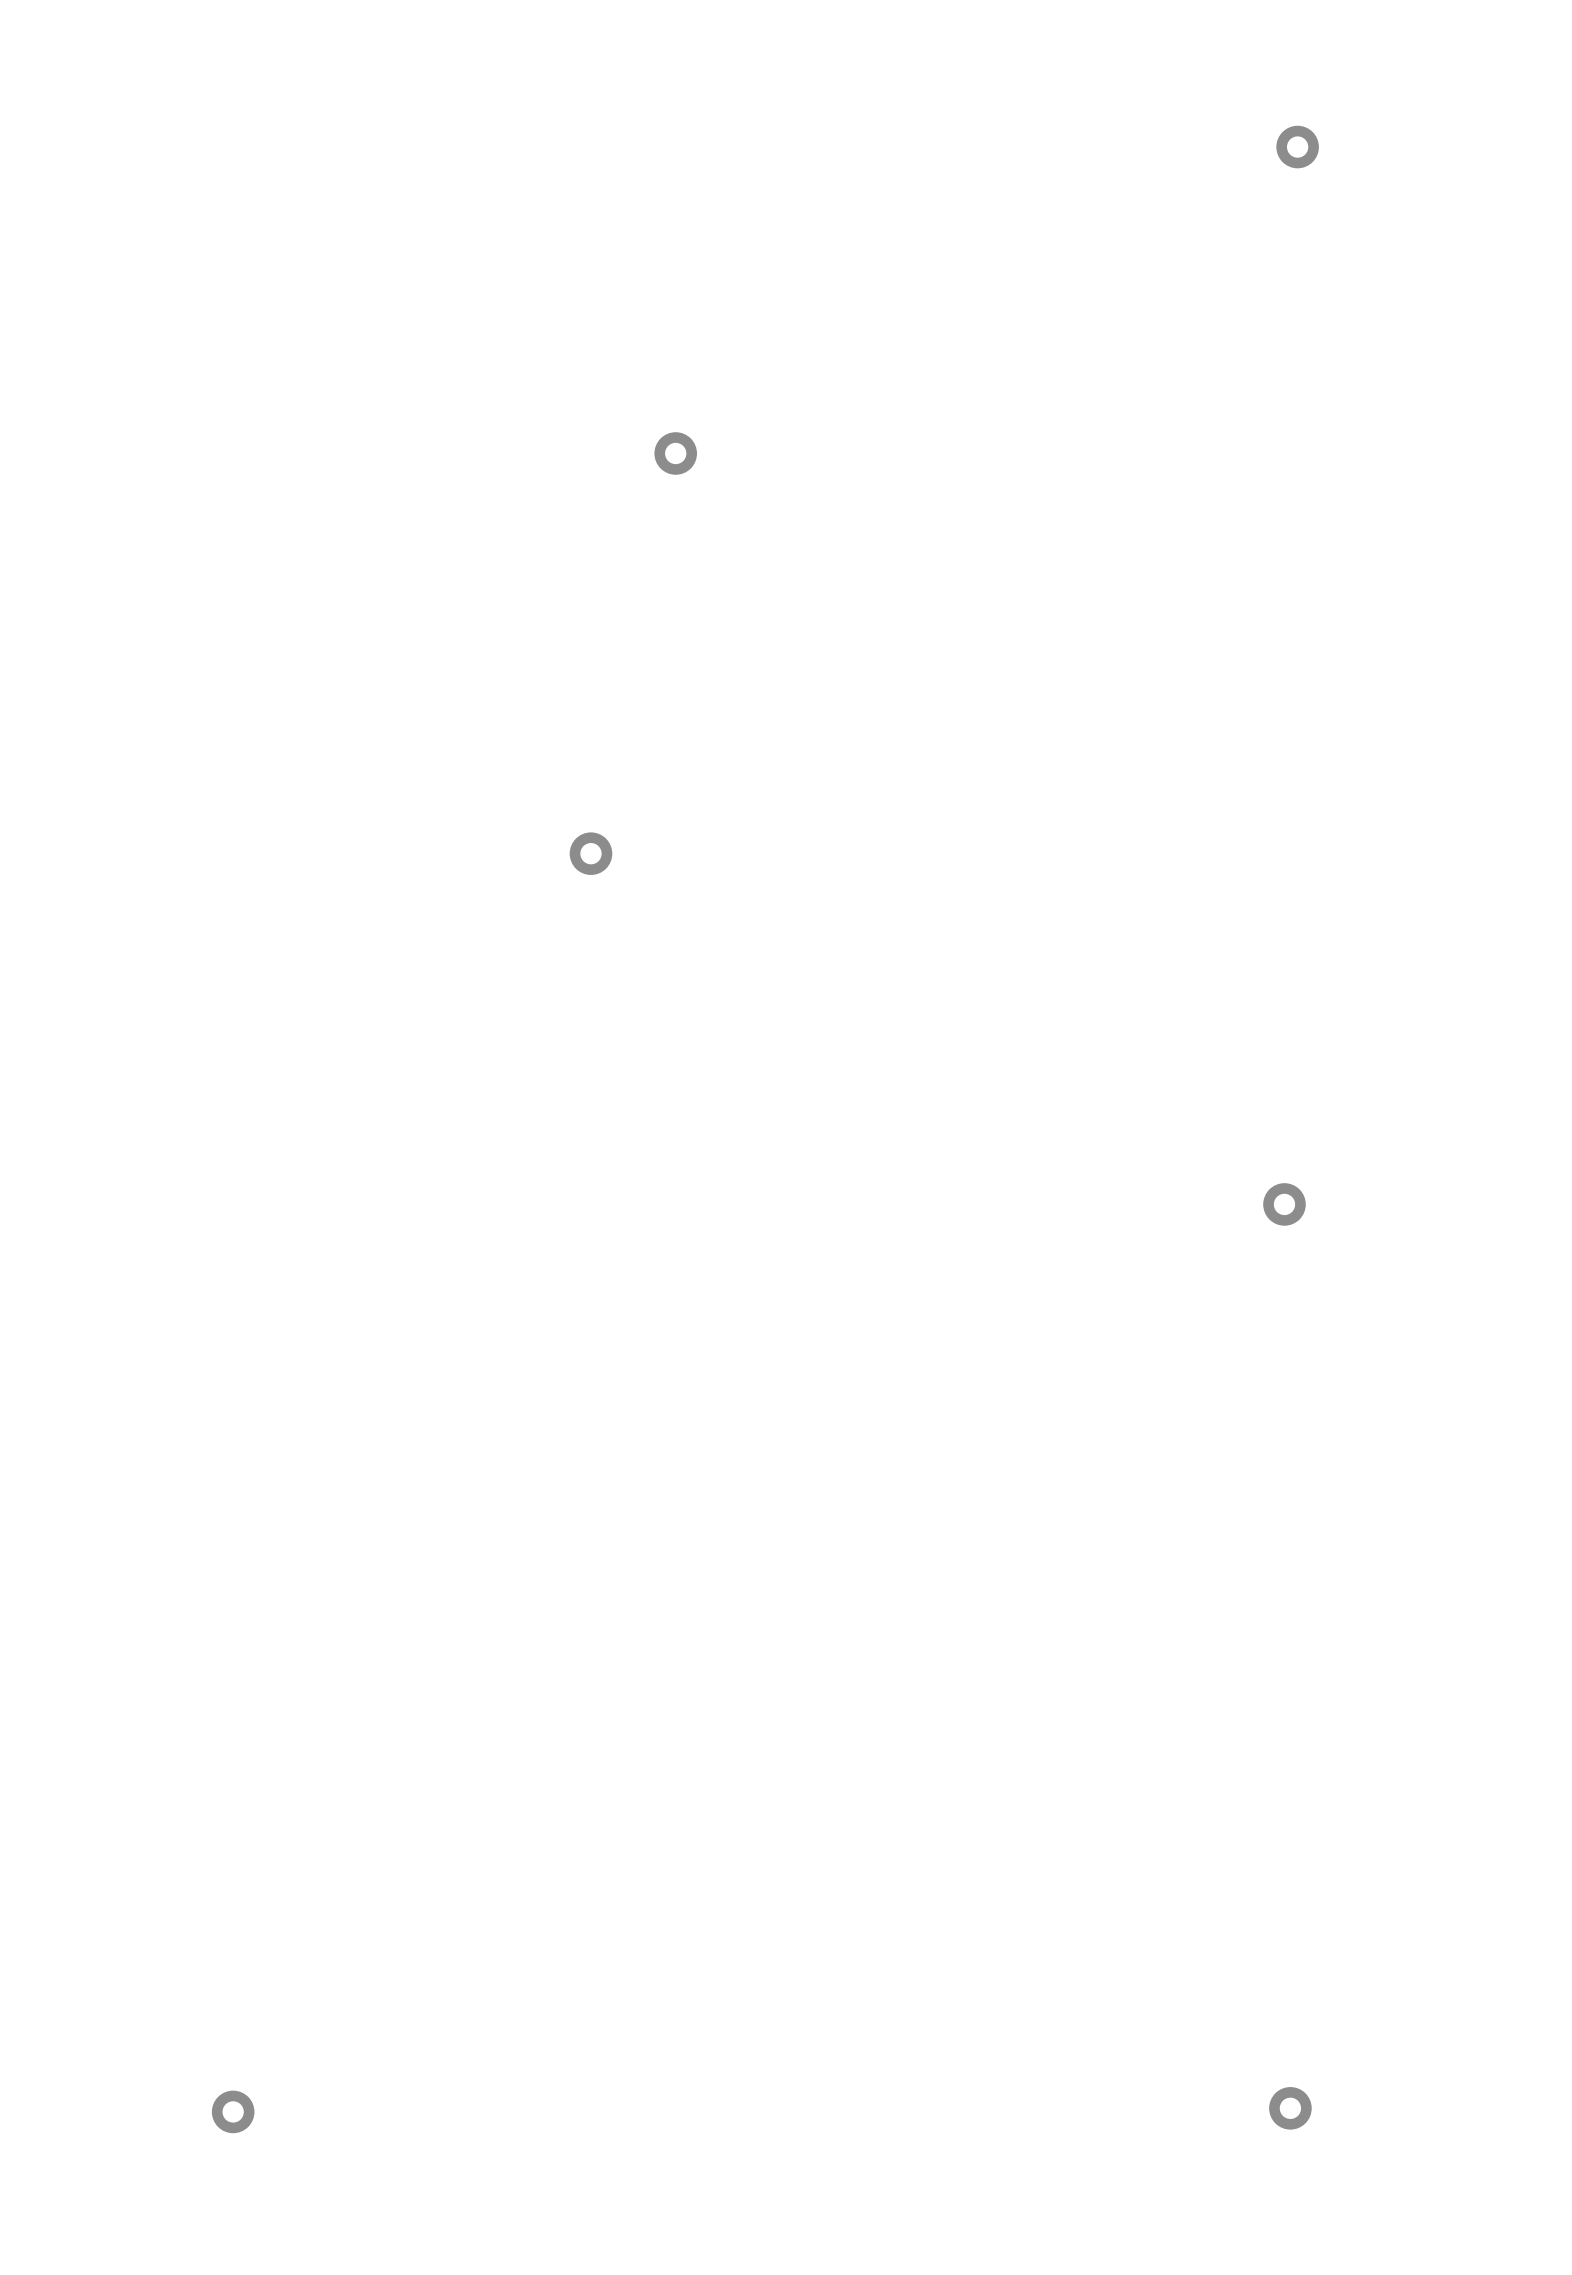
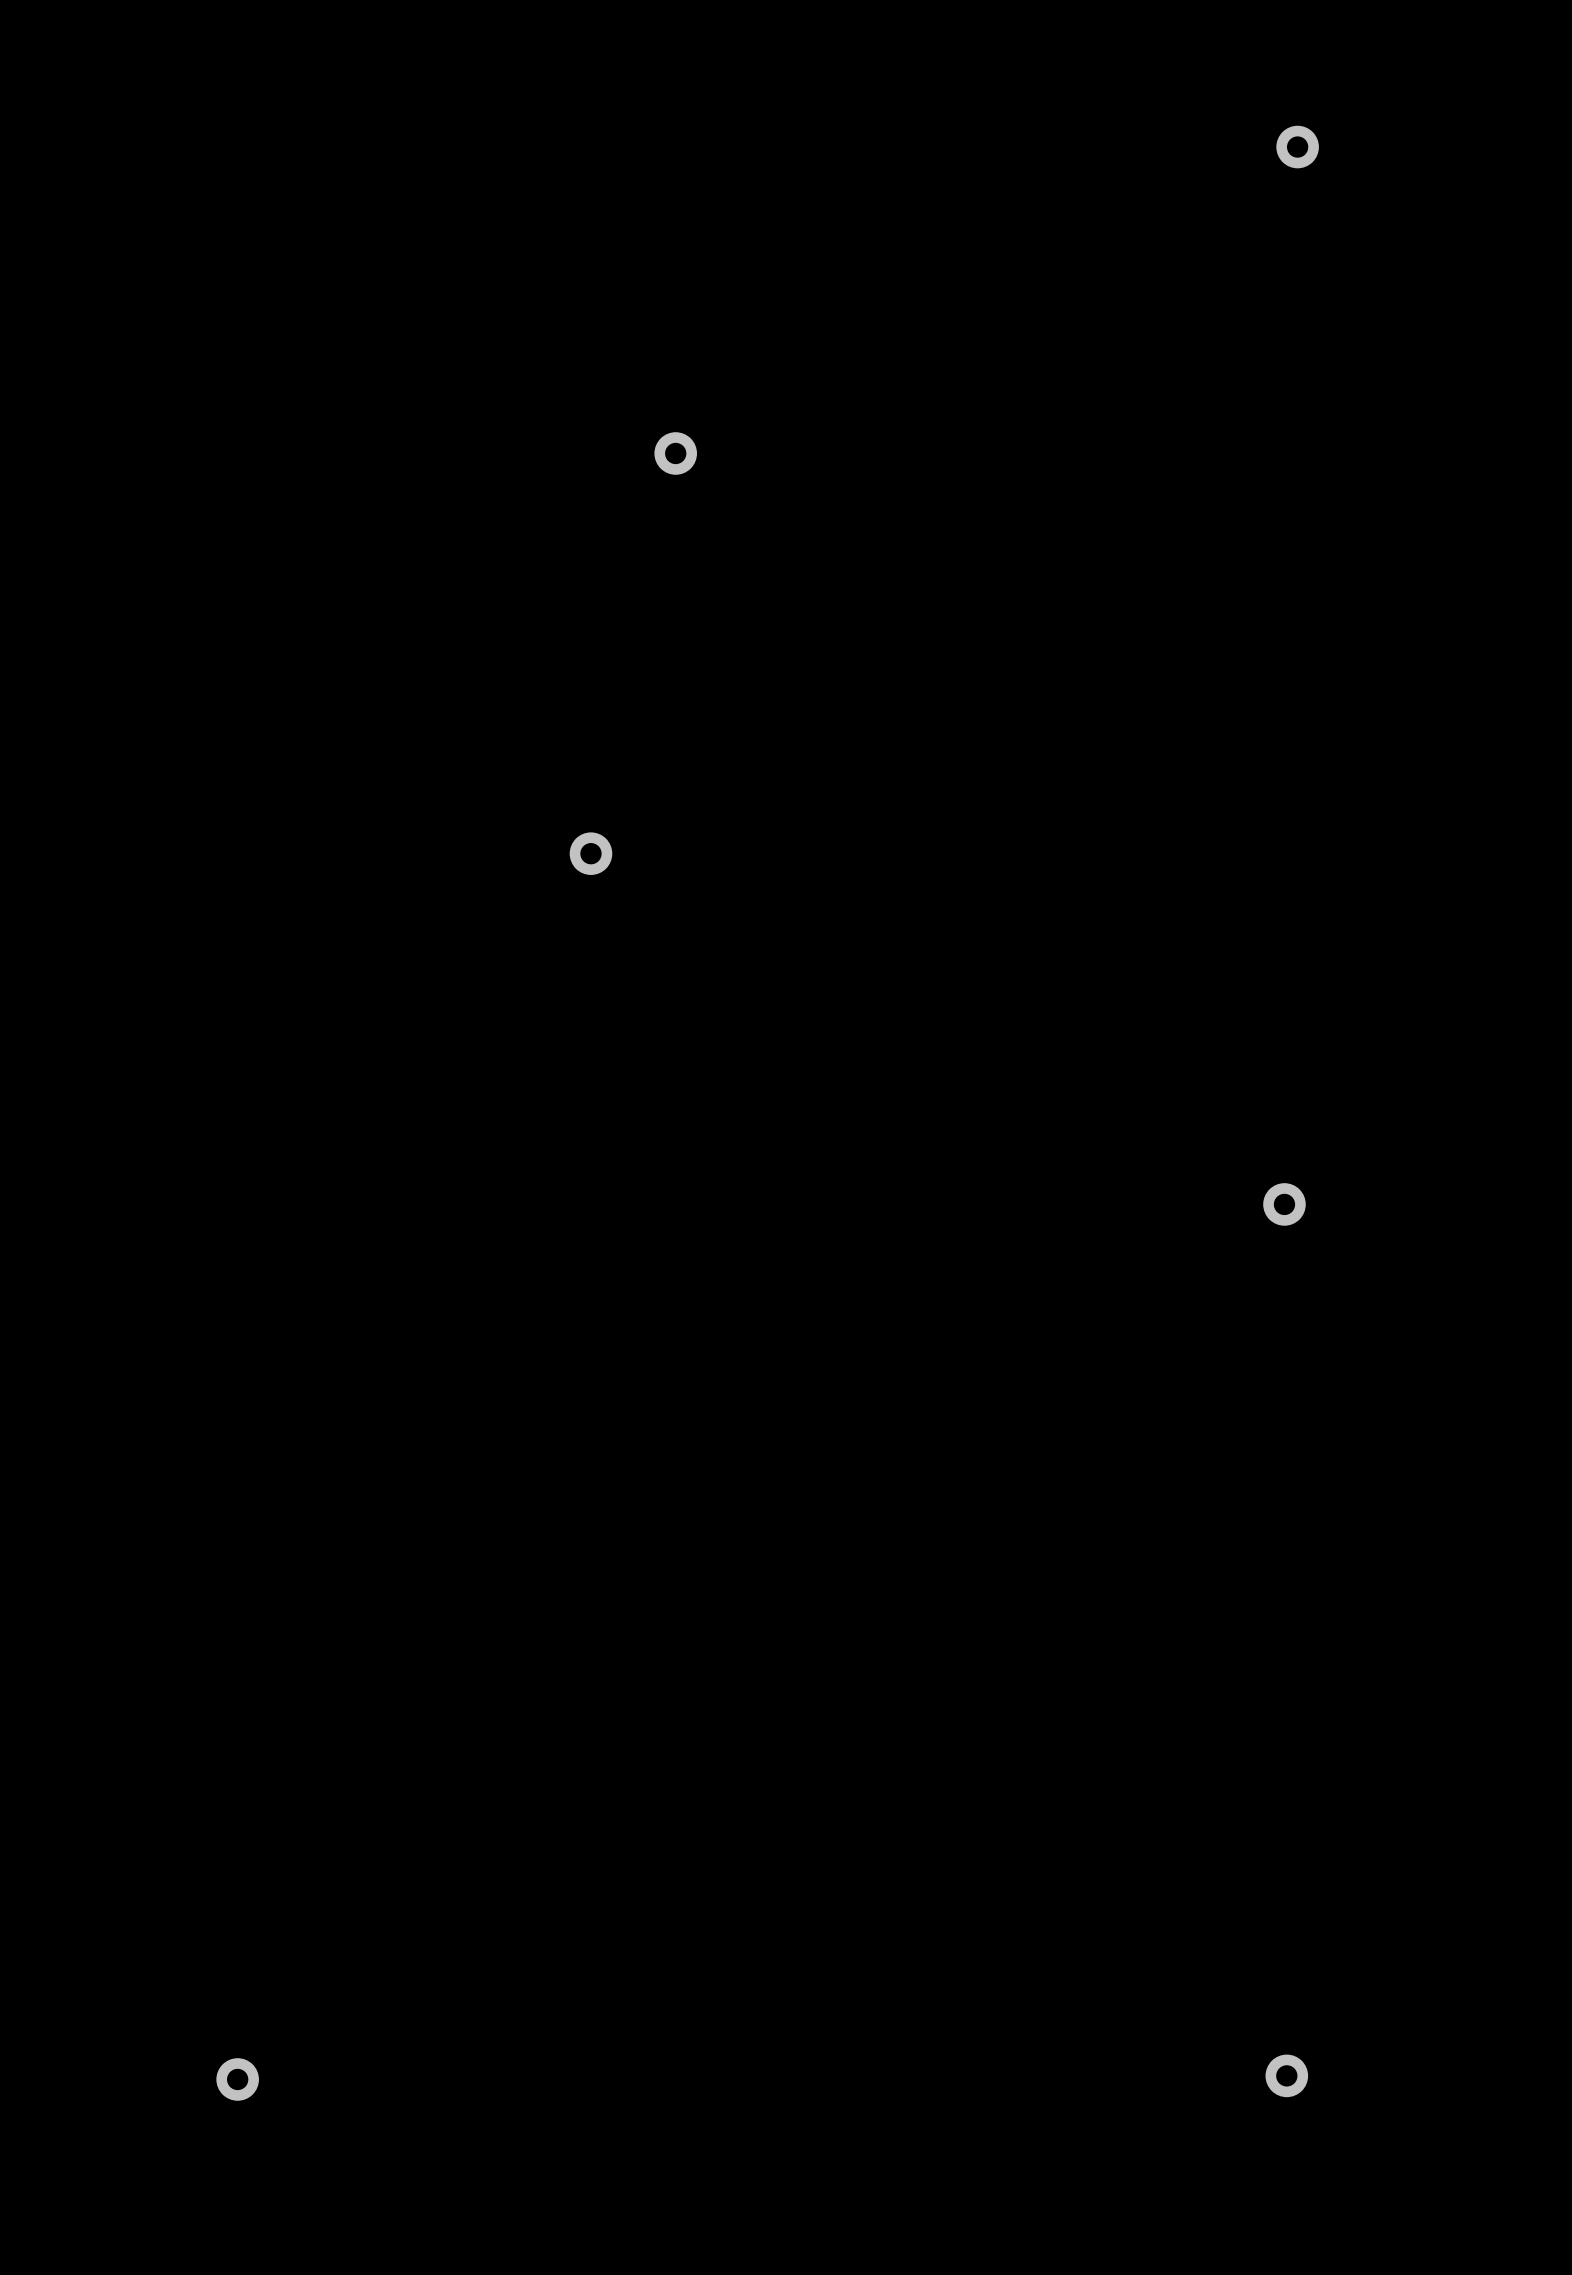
via position: (1290, 2108) -> (1286, 2075)
via position: (233, 2111) -> (237, 2079)

